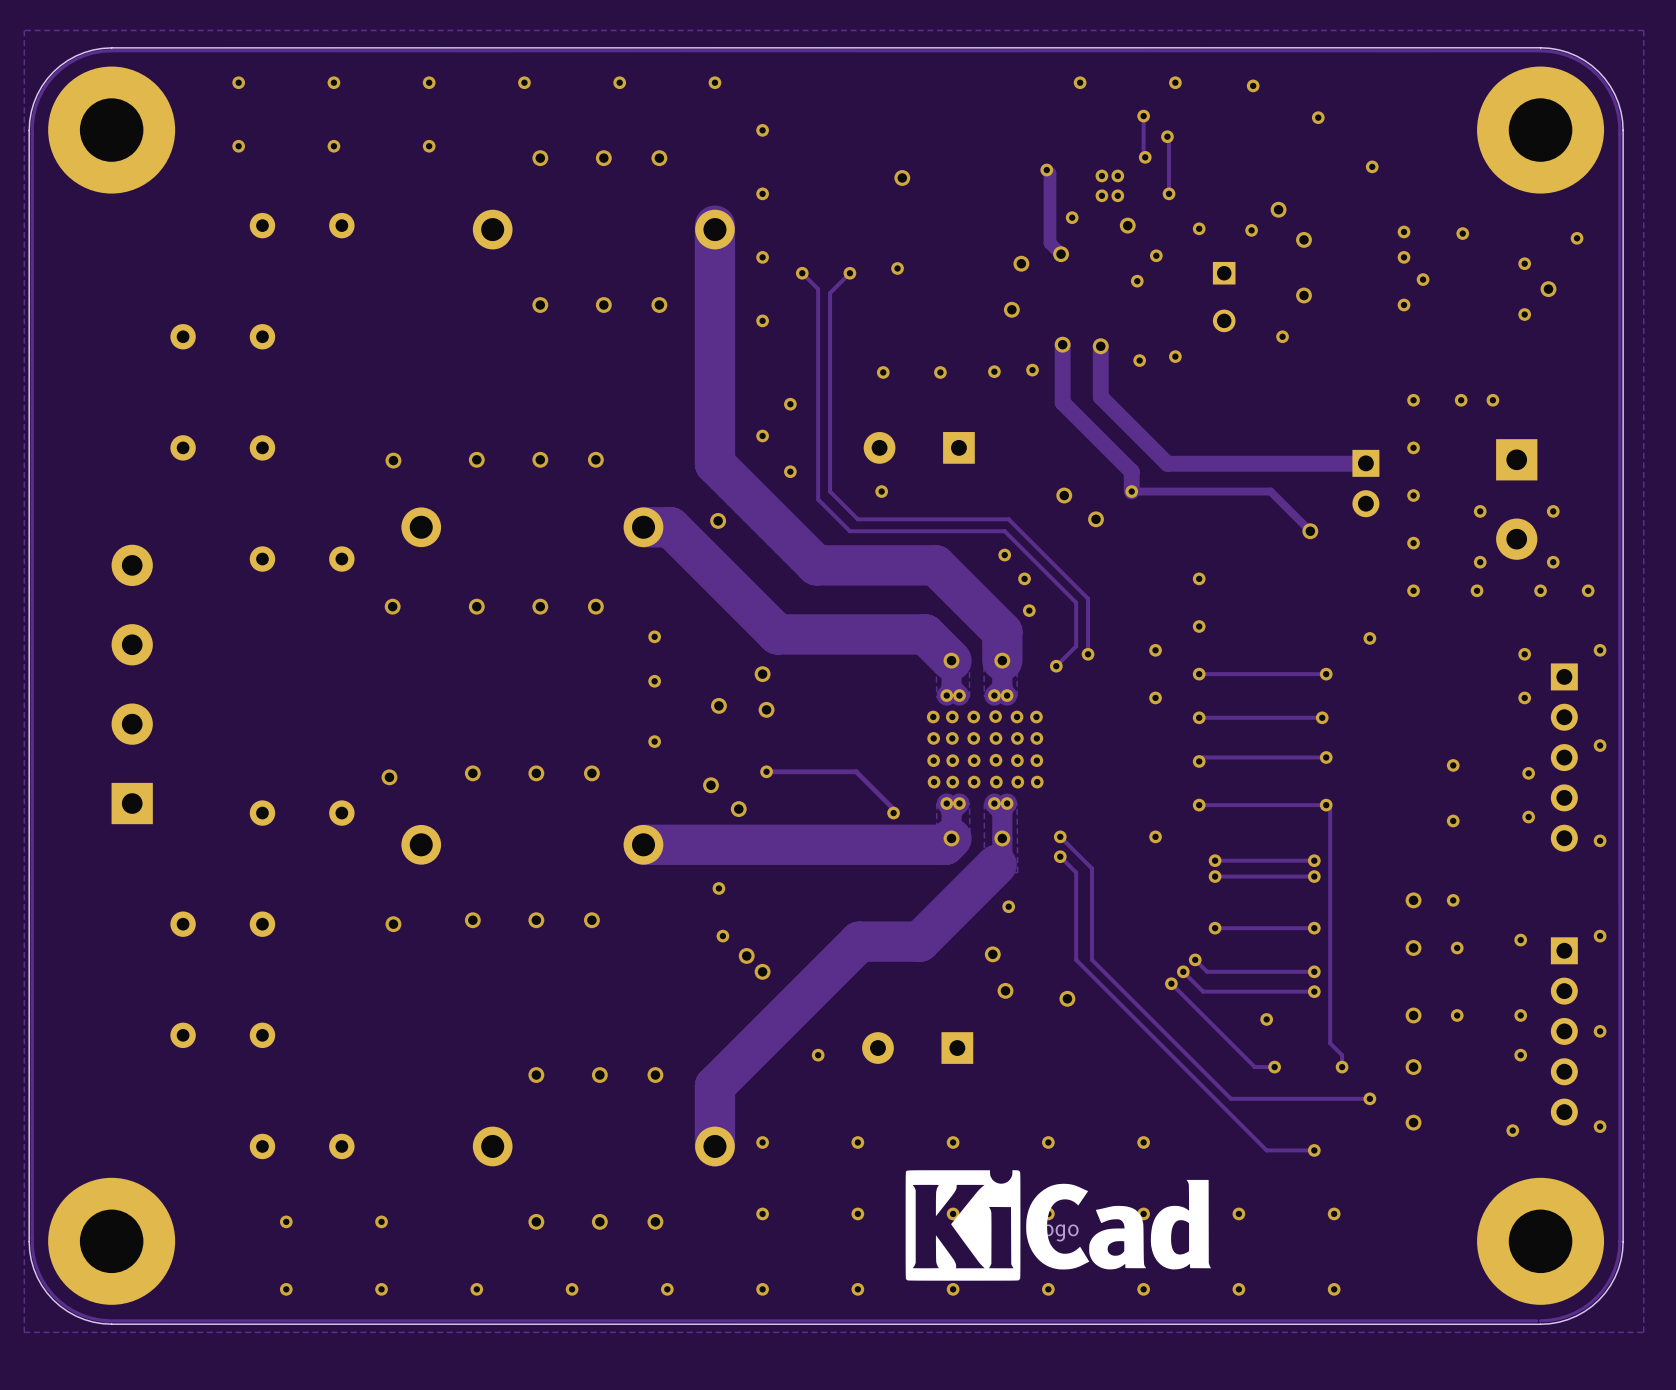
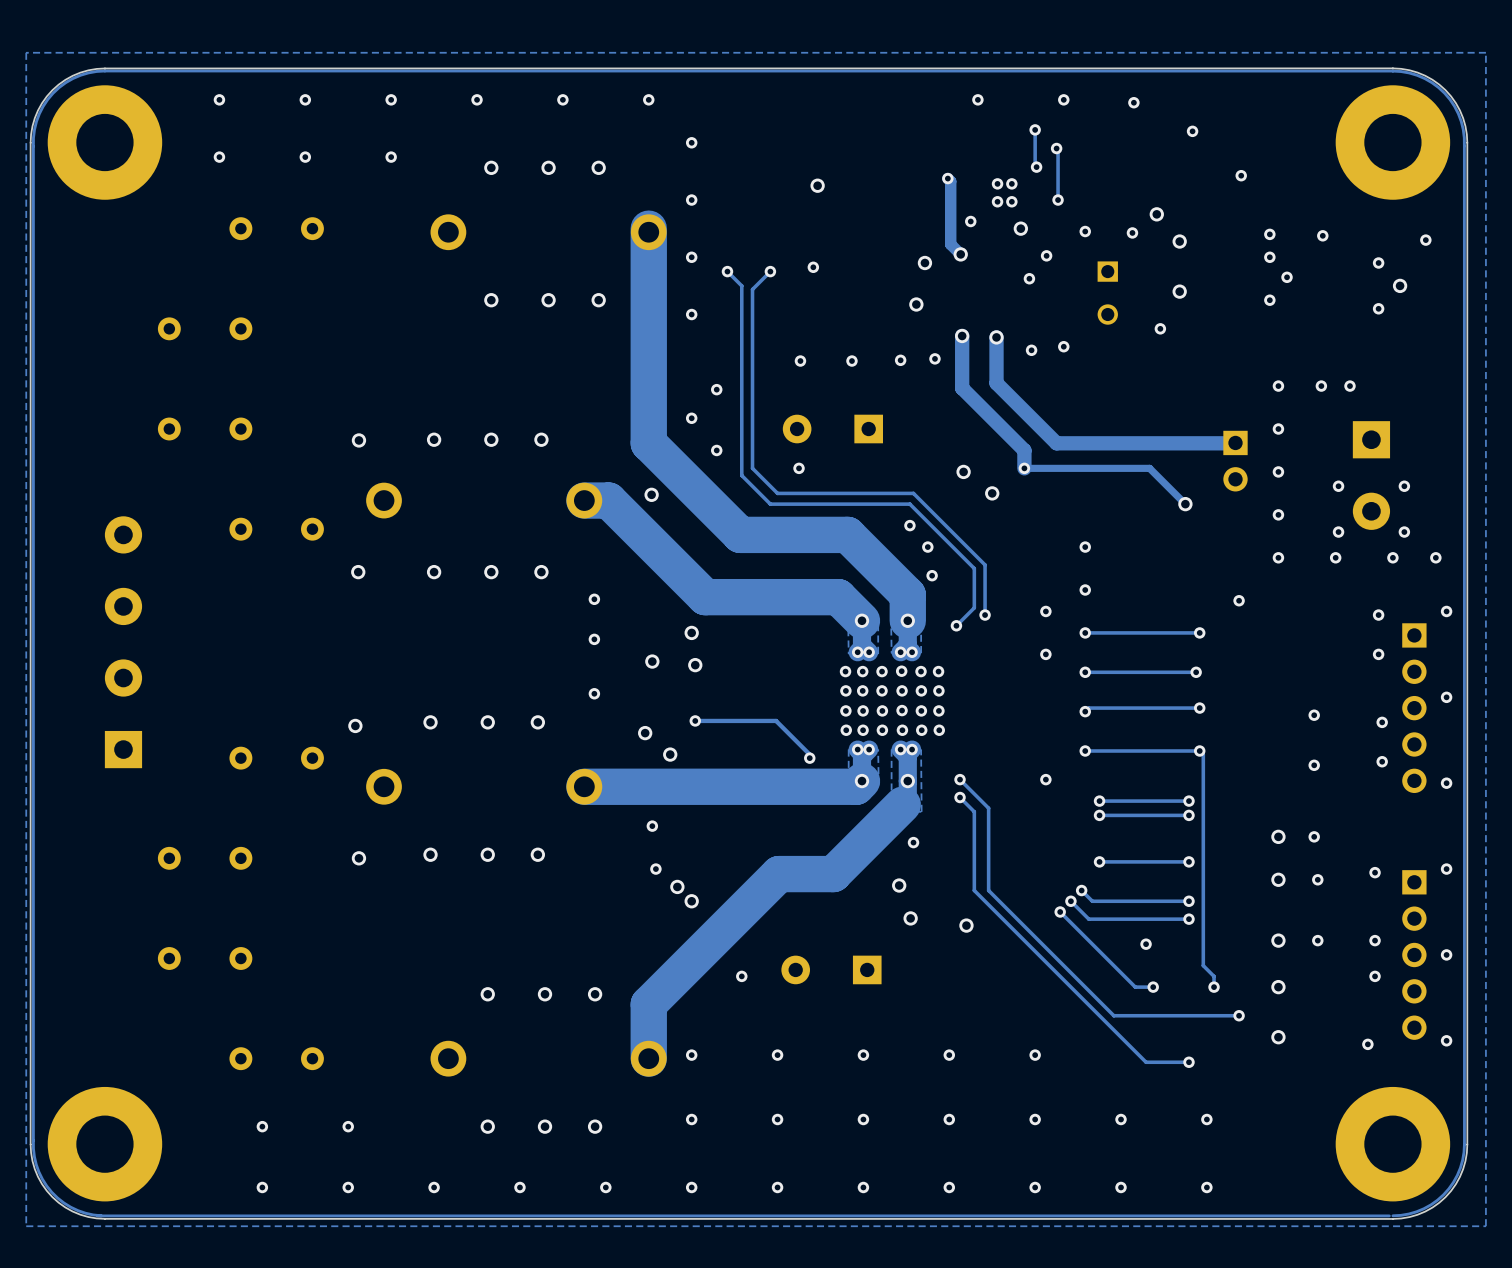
drawing: [905, 1170, 1212, 1281] -> none

